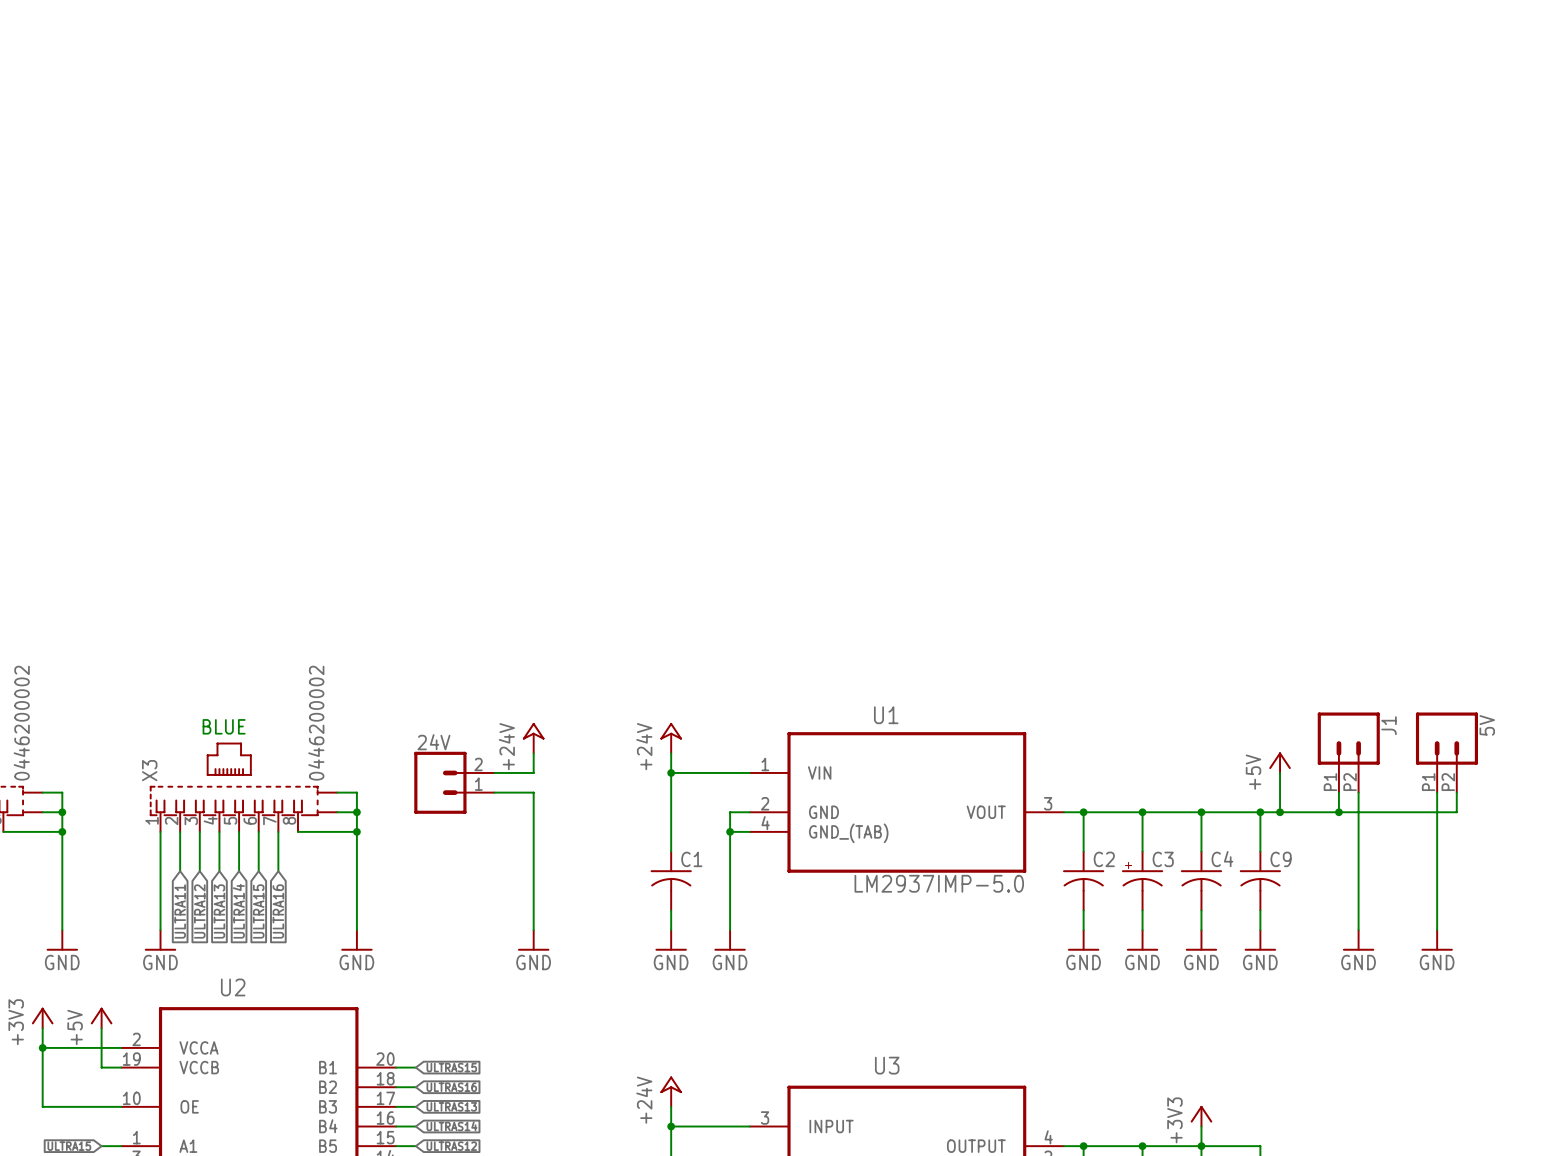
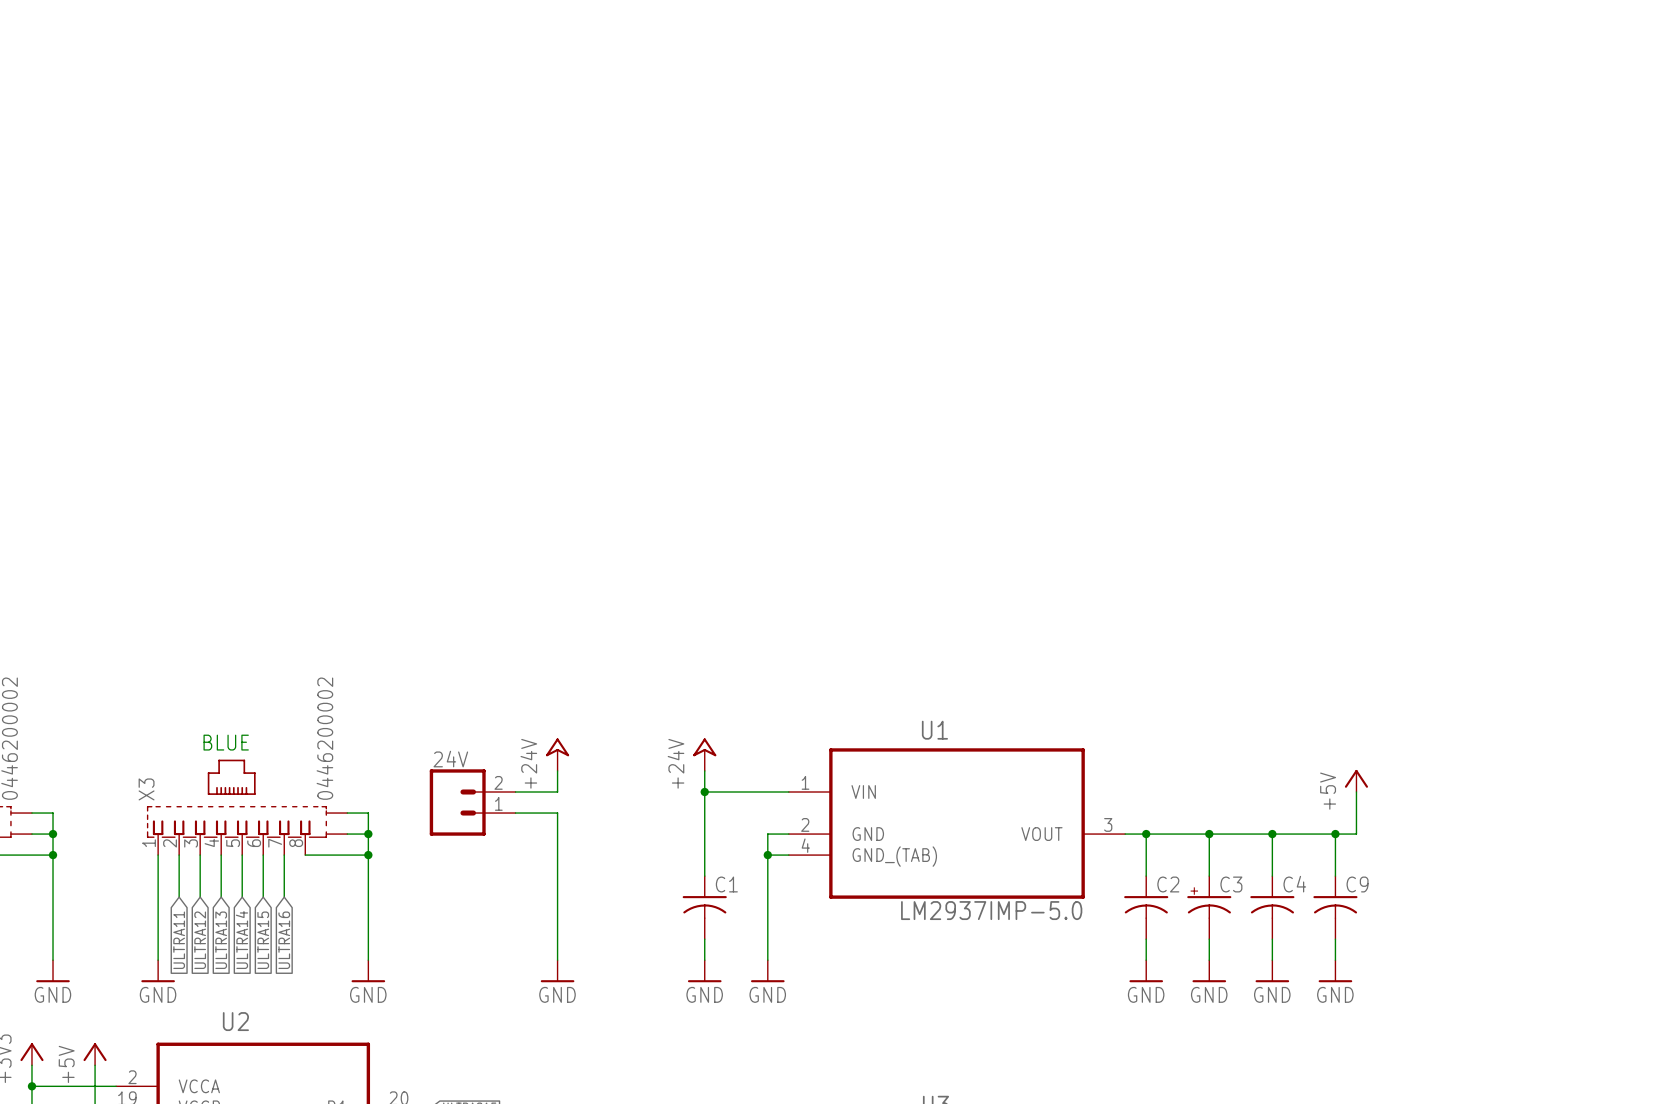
J1: (1348, 752) -> none
5V: (1446, 752) -> none
wire: (1338, 792) (1338, 812) -> none
wire: (1358, 792) (1358, 930) -> none
wire: (1437, 792) (1437, 930) -> none
wire: (1456, 792) (1456, 812) (1280, 812) -> none
junction: (1280, 812) -> none
junction: (1338, 812) -> none
power symbol: GND (1358, 940) -> none
power symbol: GND (1437, 940) -> none

